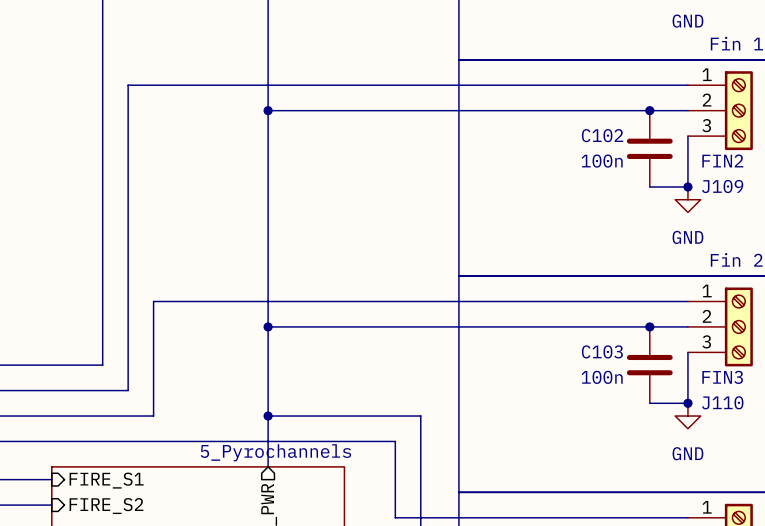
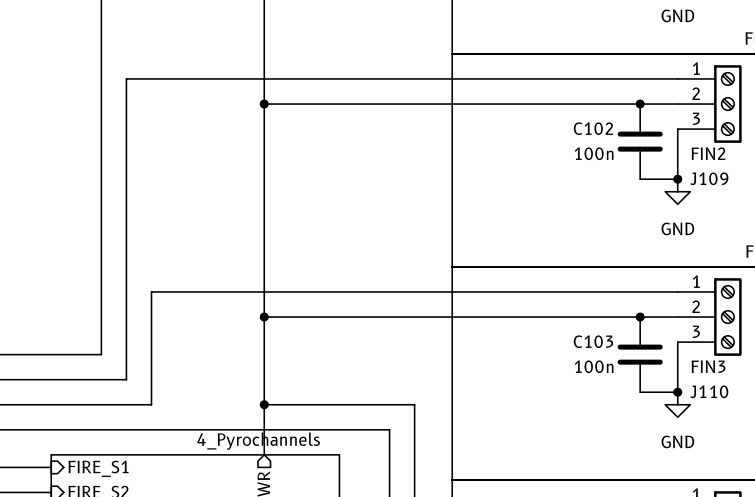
sheet 5_Pyrochannels name: 5_Pyrochannels (275, 452) -> 4_Pyrochannels (258, 441)

